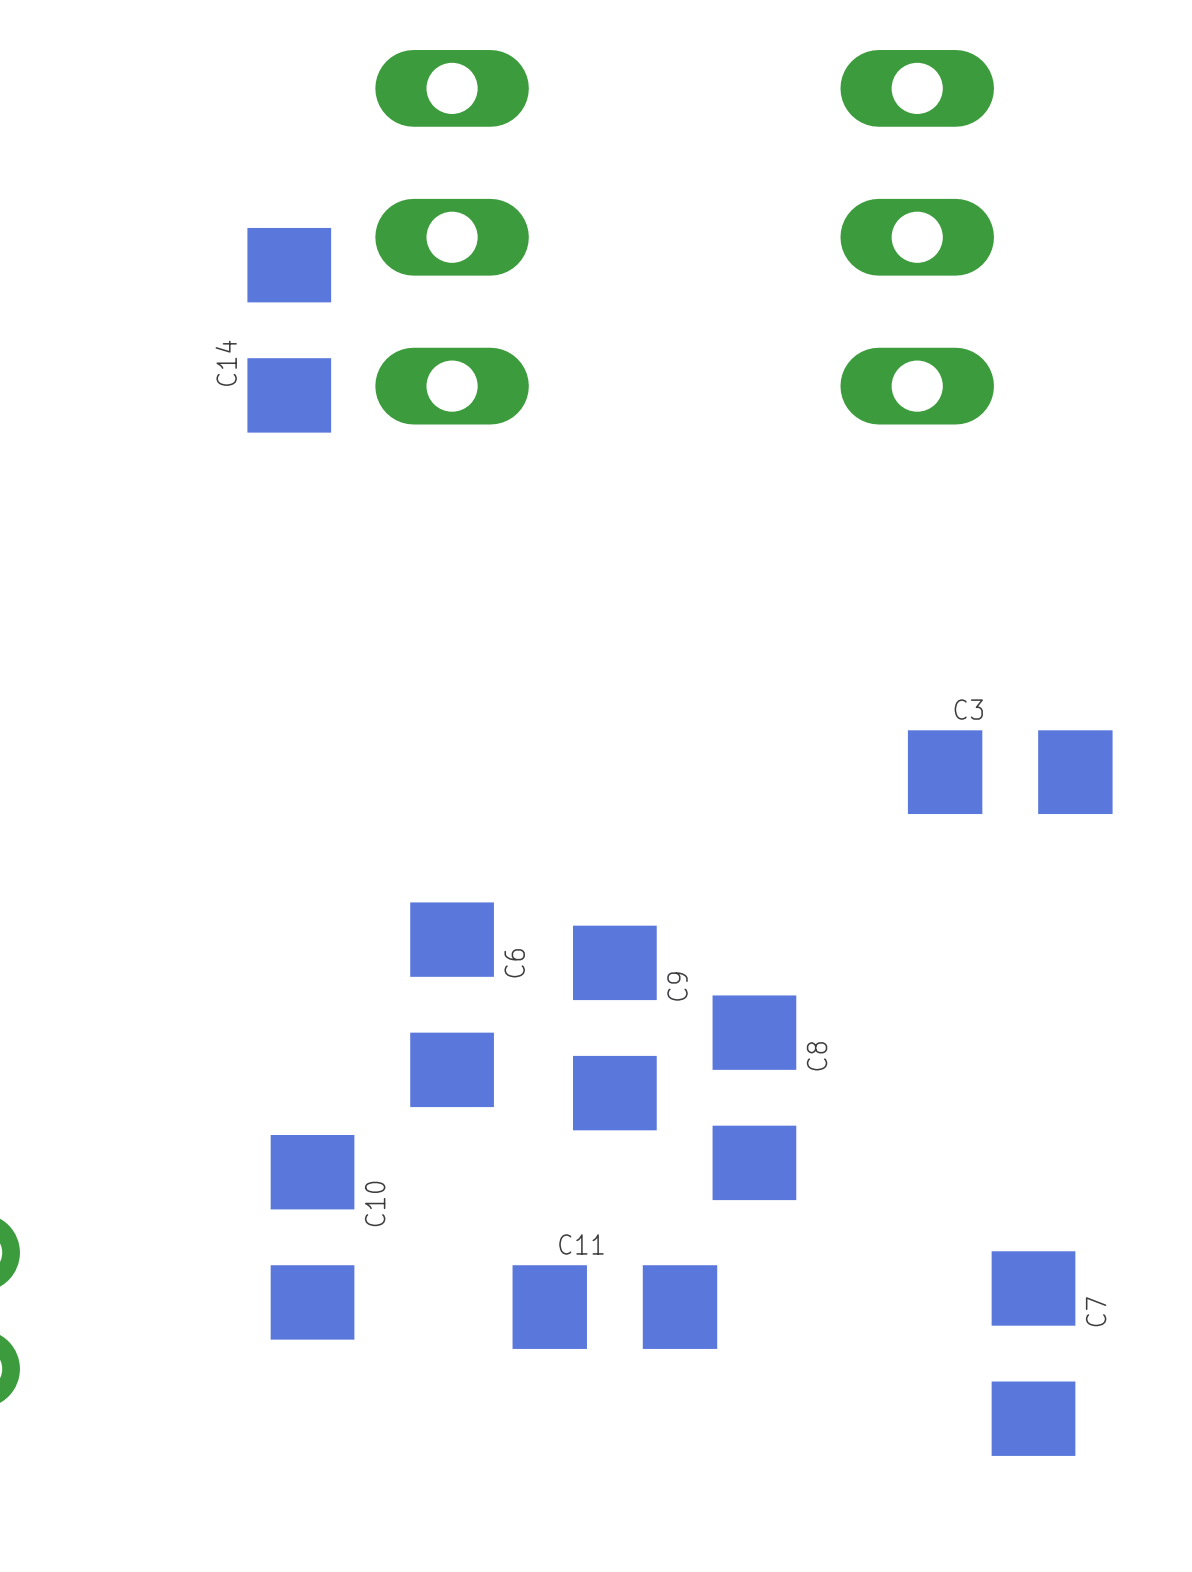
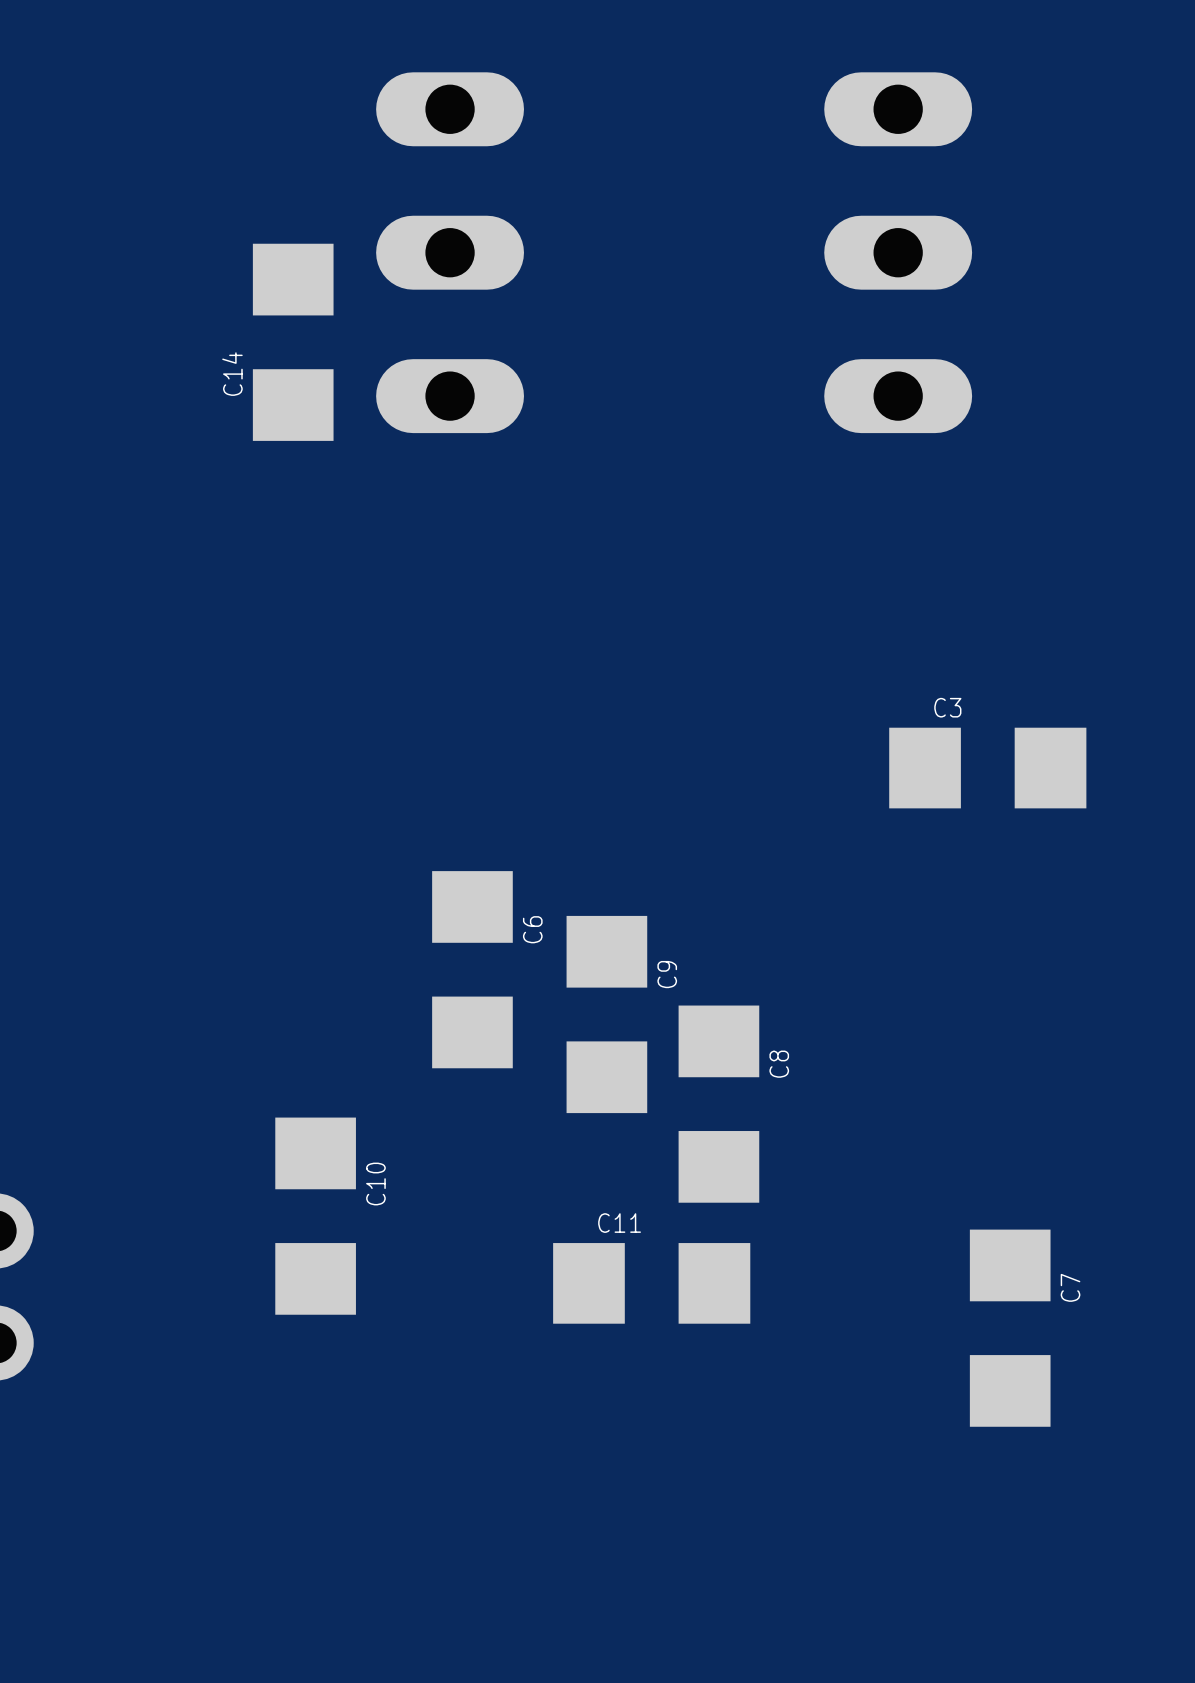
C6 position: (452, 1004) -> (472, 969)
C8 position: (754, 1097) -> (718, 1104)
C11 position: (614, 1307) -> (651, 1283)

